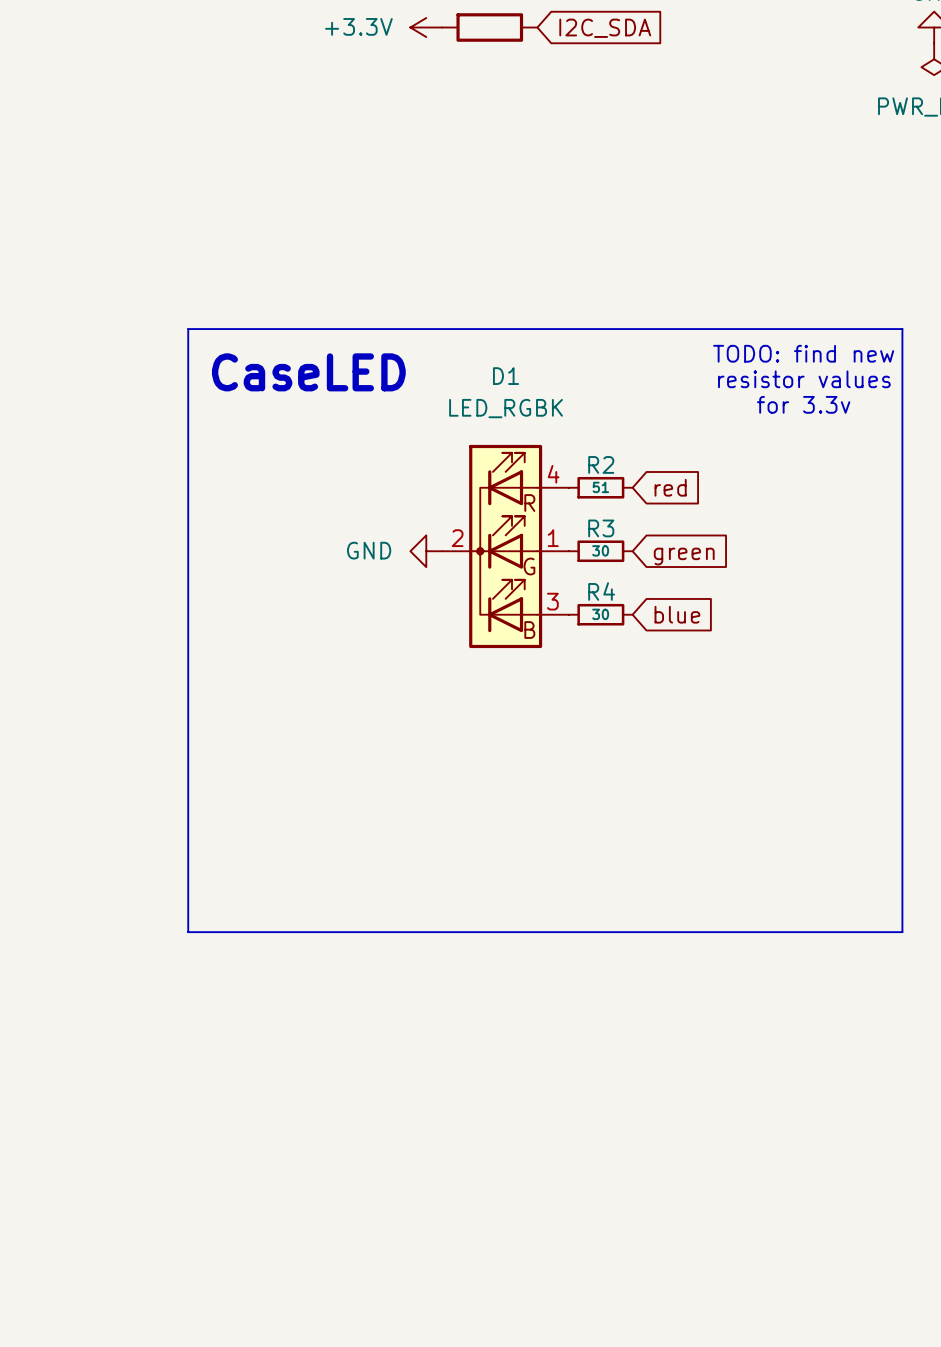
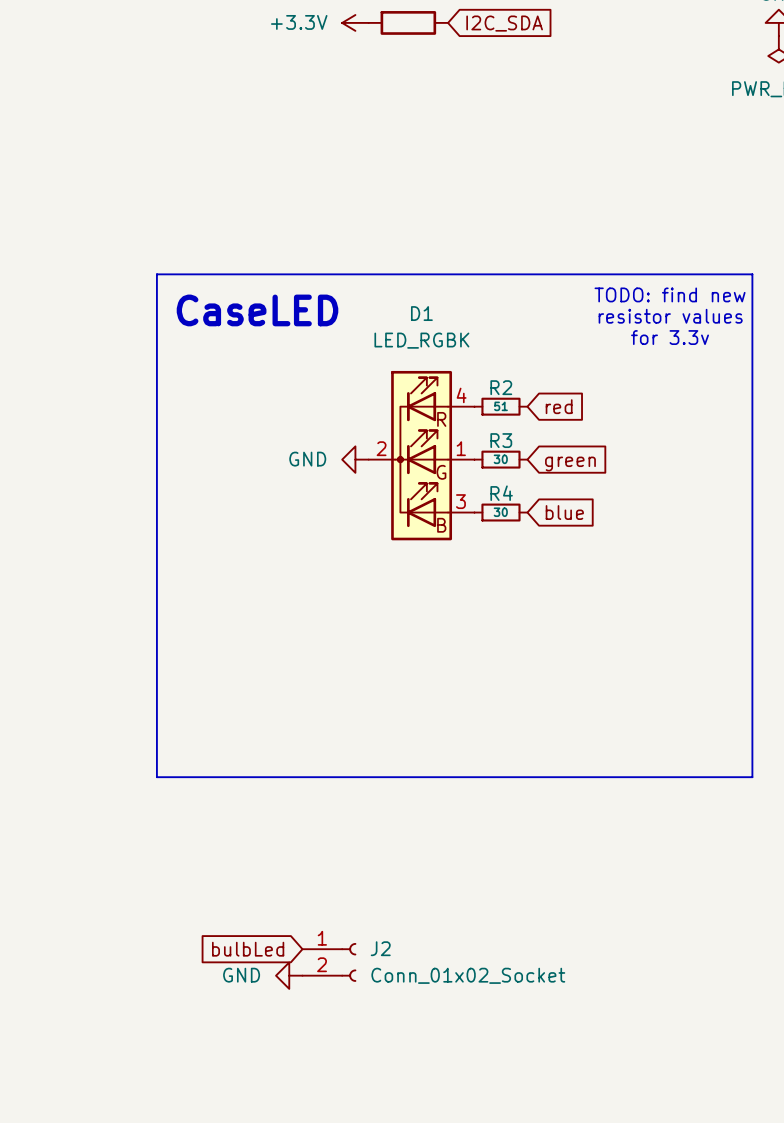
global label: none -> bulbLed (248, 949)
J2: none -> Conn_01x02_Socket (329, 962)
power symbol: none -> GND (289, 975)

